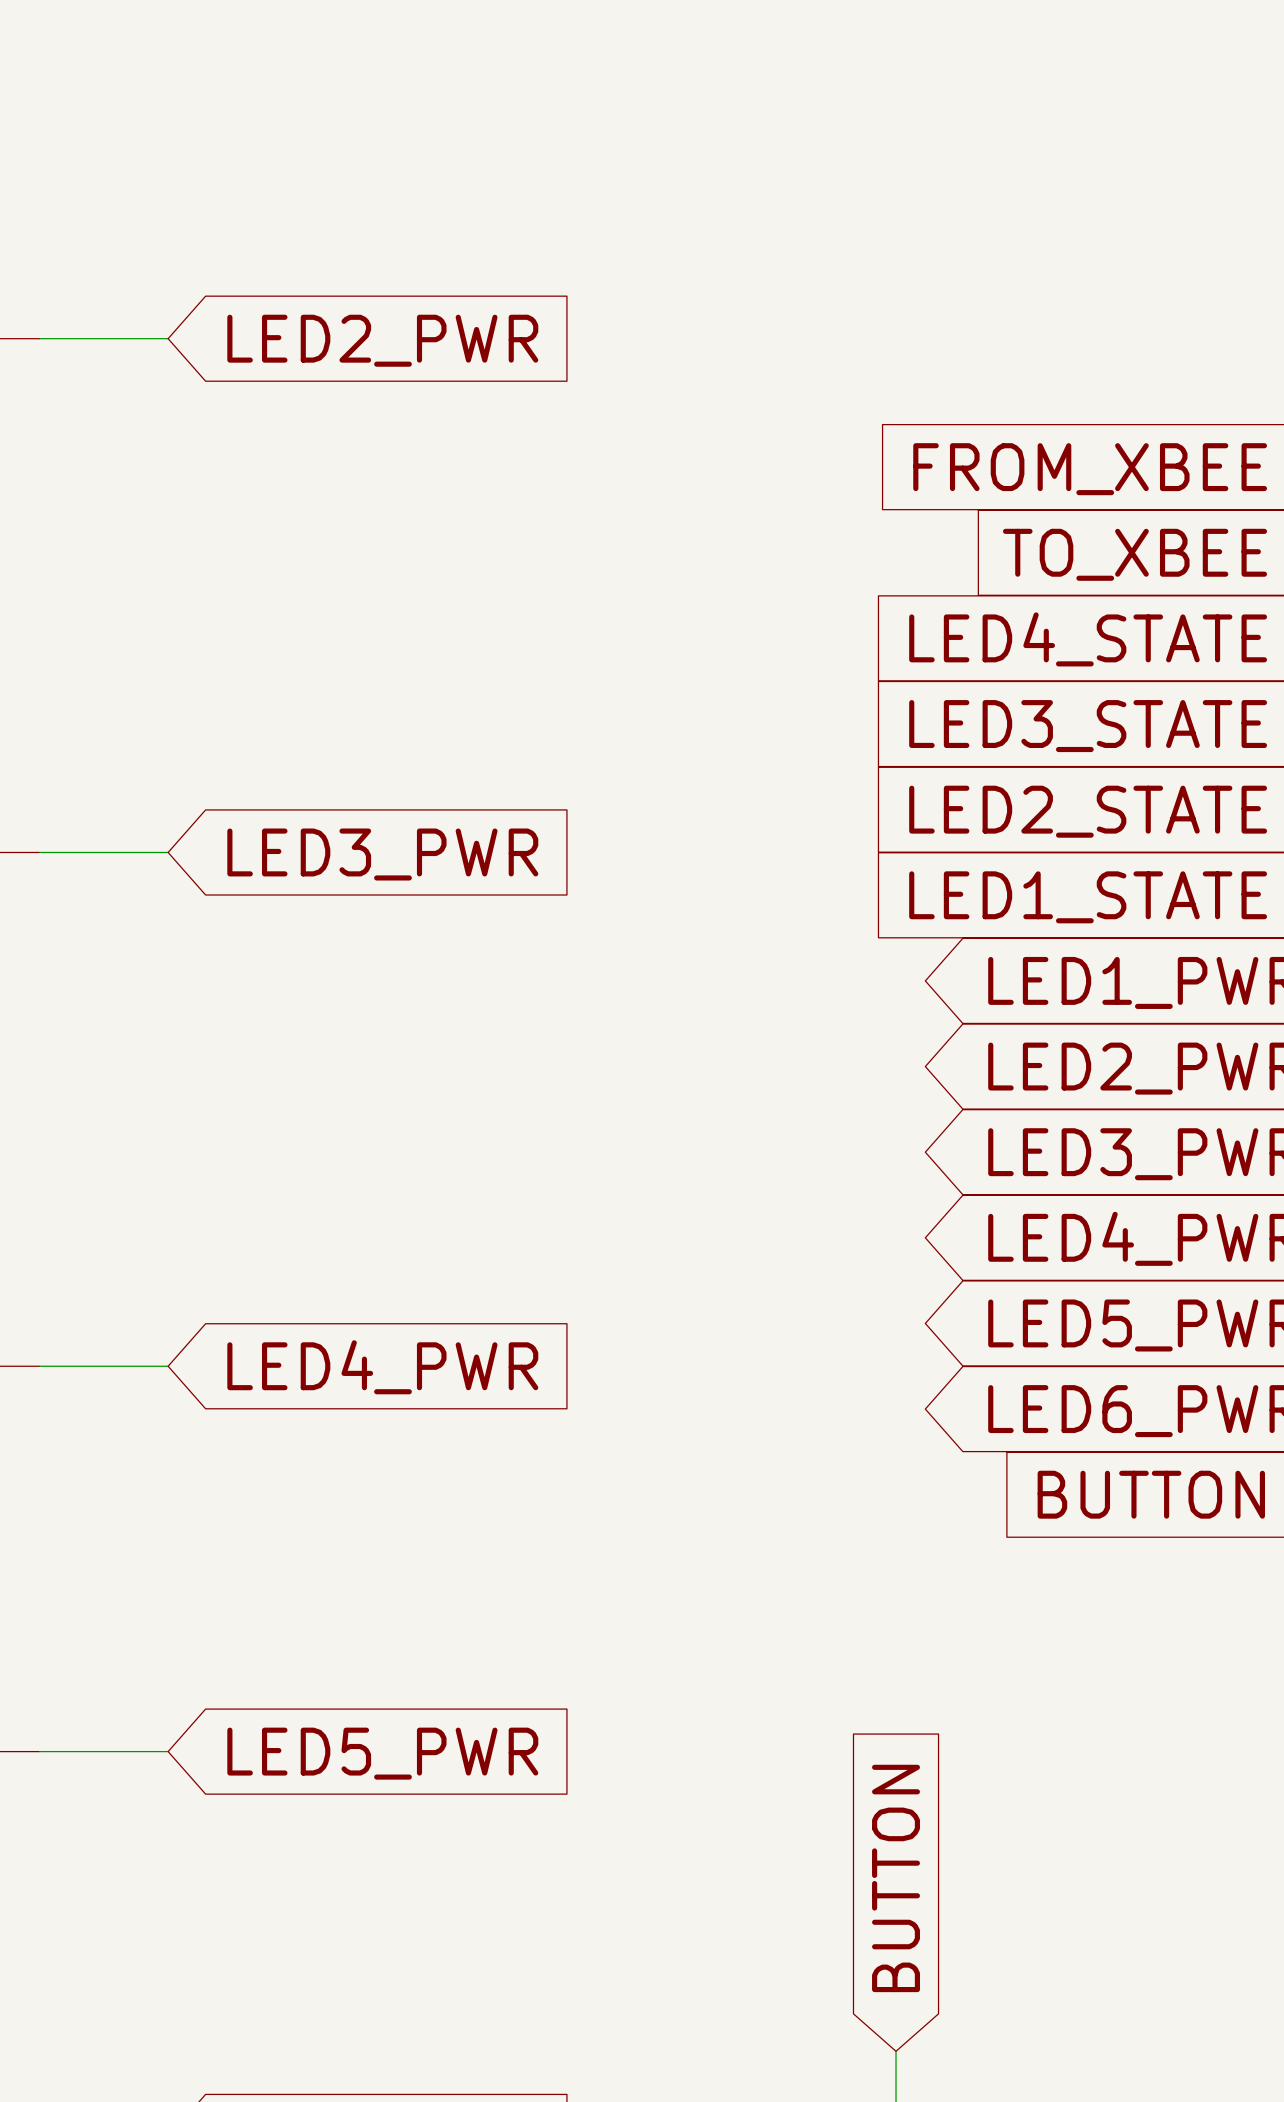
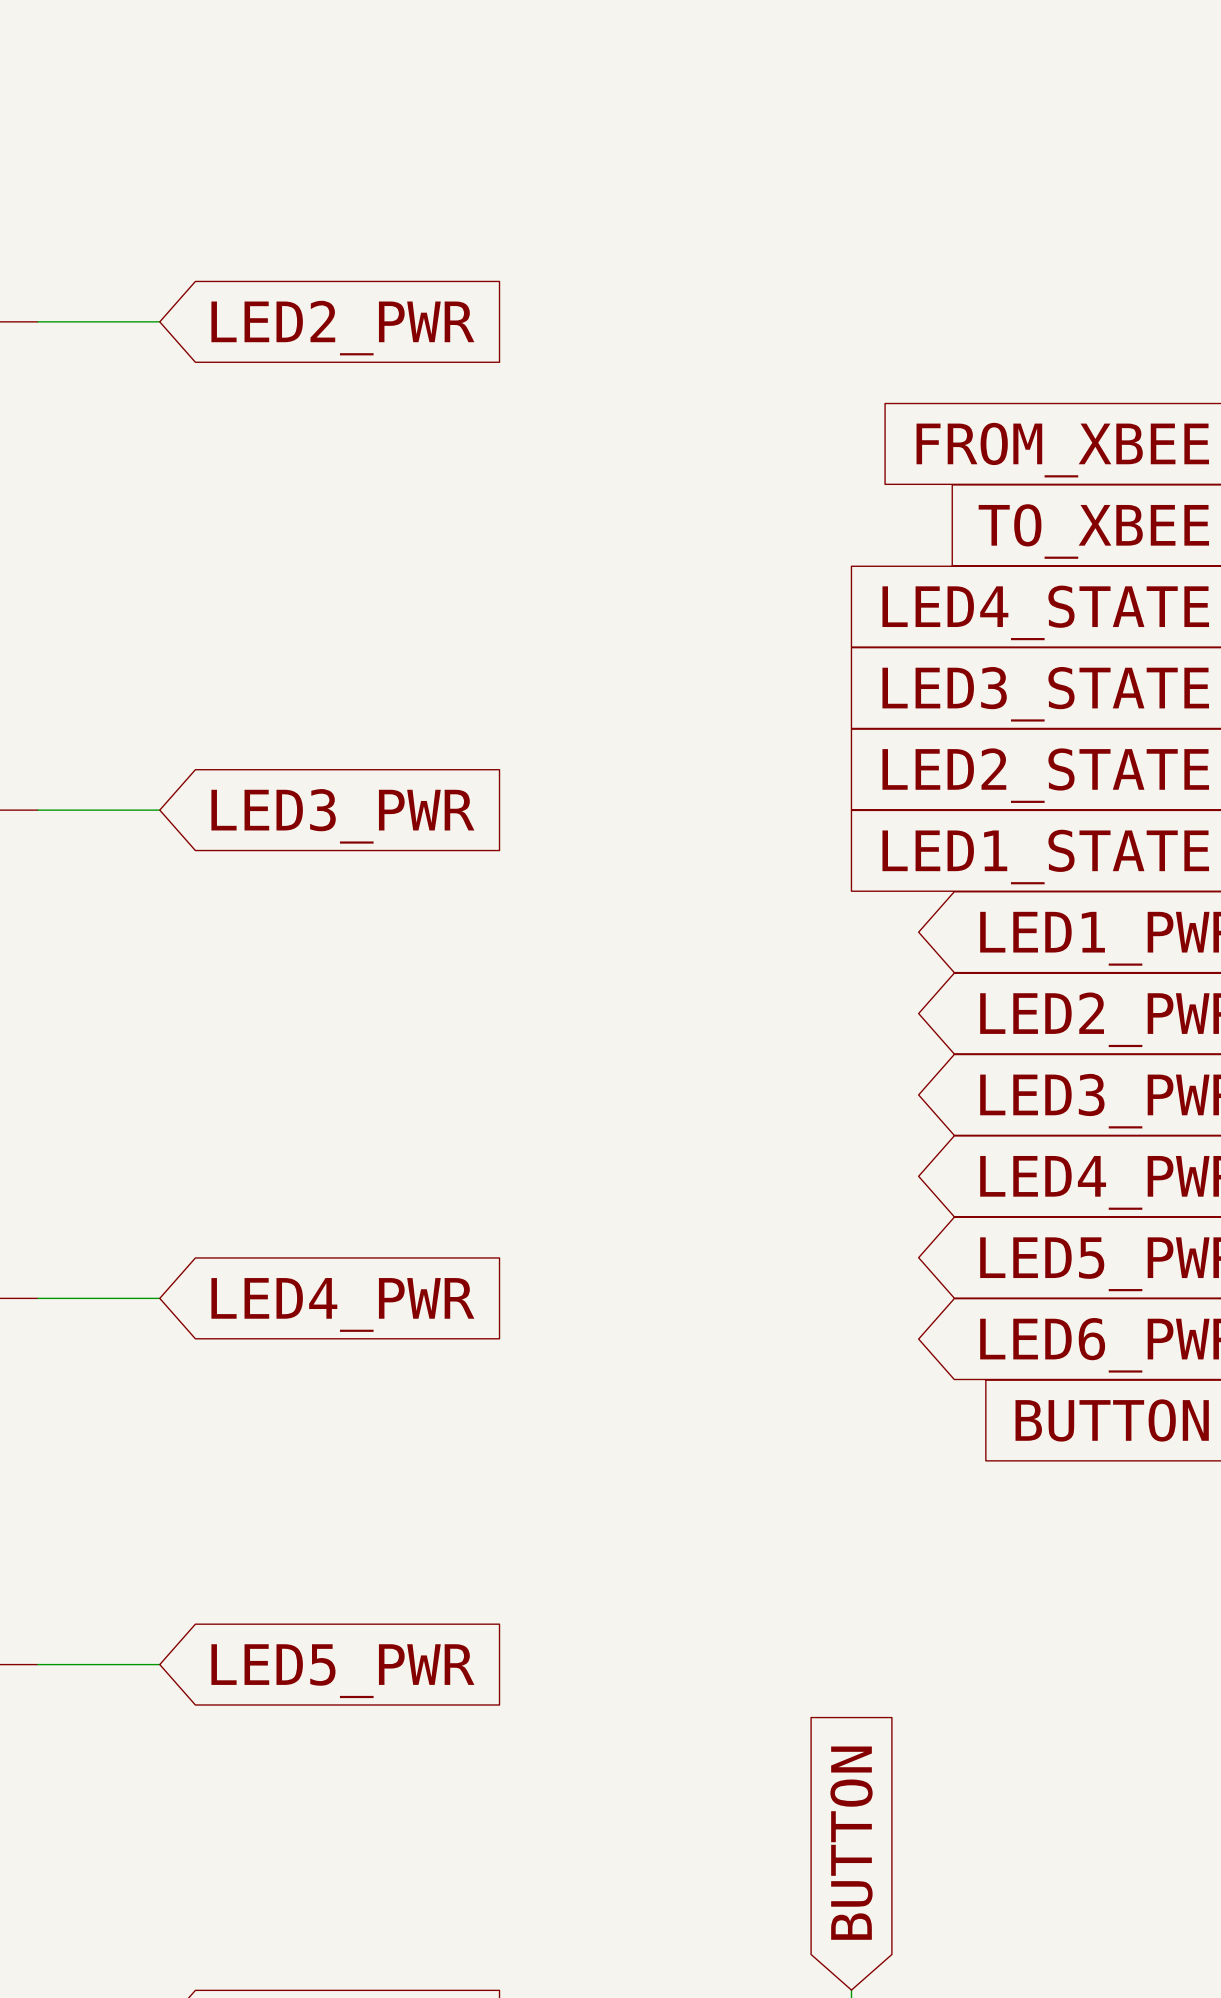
global label position: BUTTON (896, 1878) -> BUTTON (851, 1843)
wire: (896, 2051) (896, 2094) -> none

